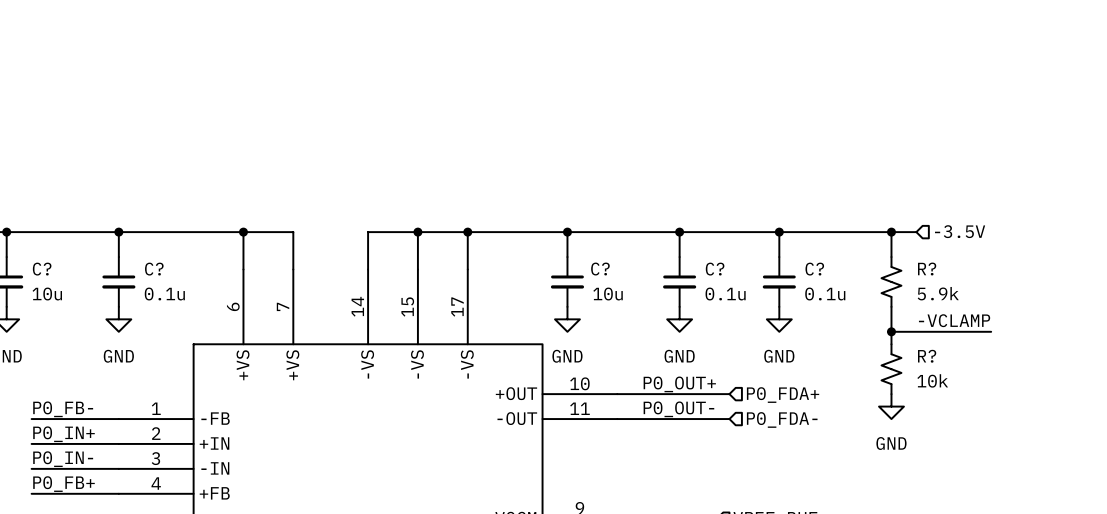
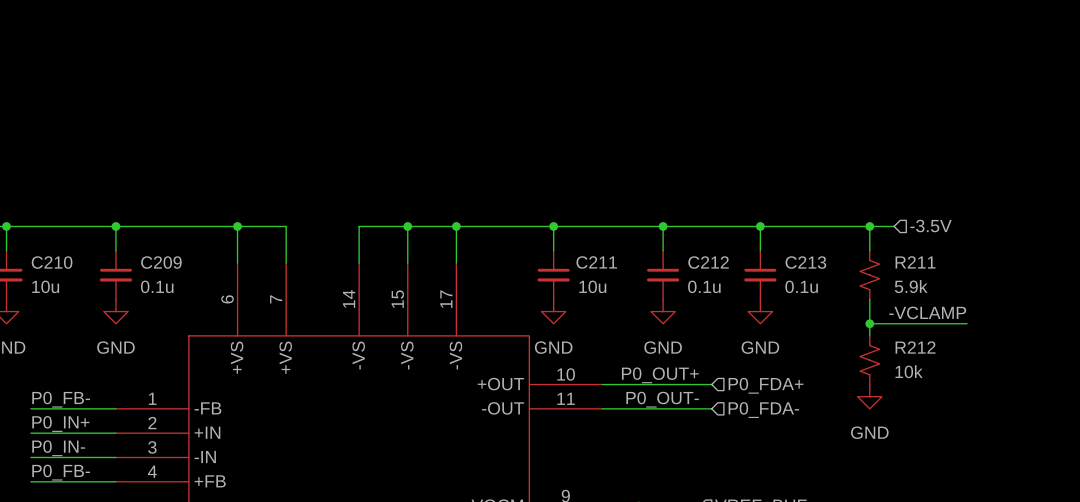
C? name: C? (42, 269) -> C210 (52, 262)
C? name: C? (154, 269) -> C209 (161, 262)
C? name: C? (600, 269) -> C211 (596, 262)
C? name: C? (715, 269) -> C212 (708, 262)
C? name: C? (814, 269) -> C213 (805, 262)
R? name: R? (927, 269) -> R211 (915, 262)
R? name: R? (927, 356) -> R212 (915, 347)
label: P0_FB+ (64, 484) -> P0_FB- (61, 472)

